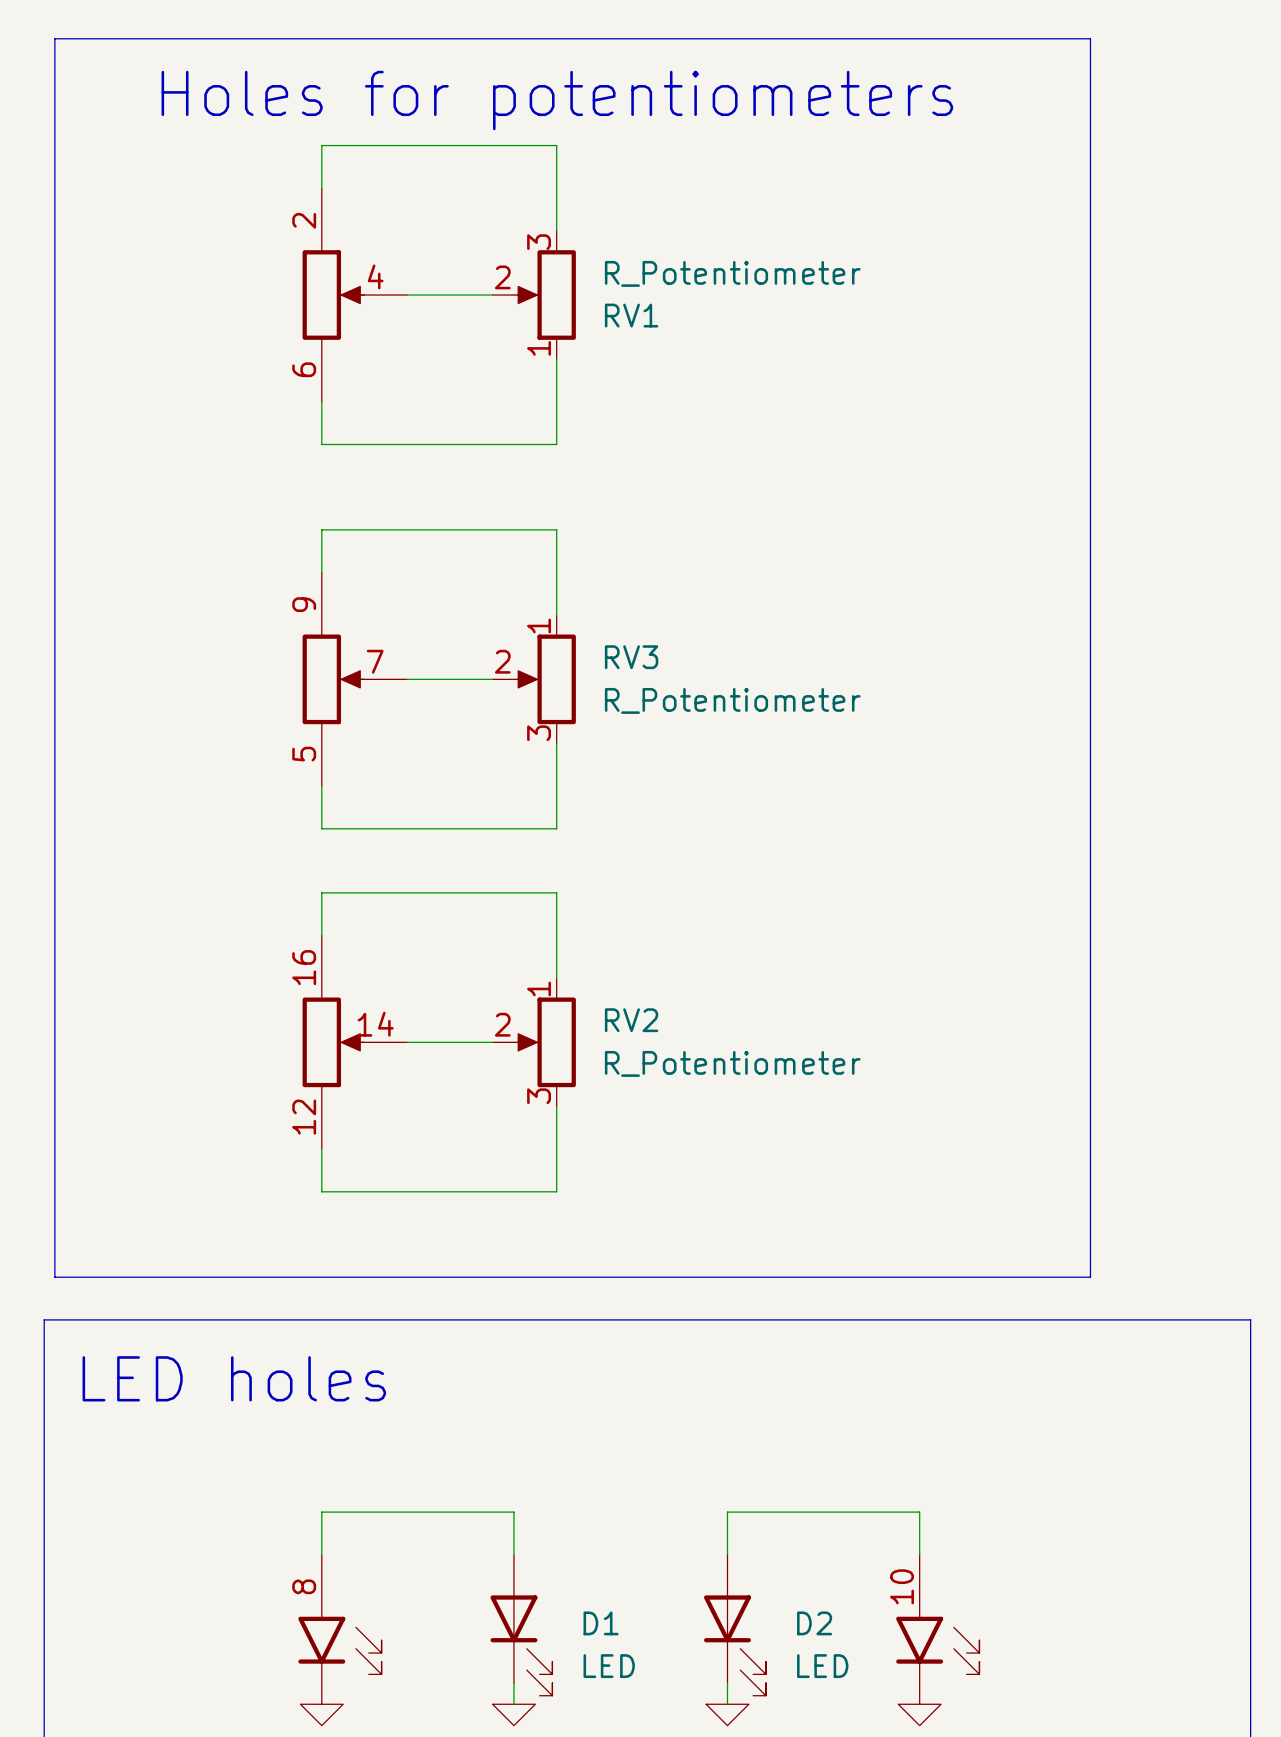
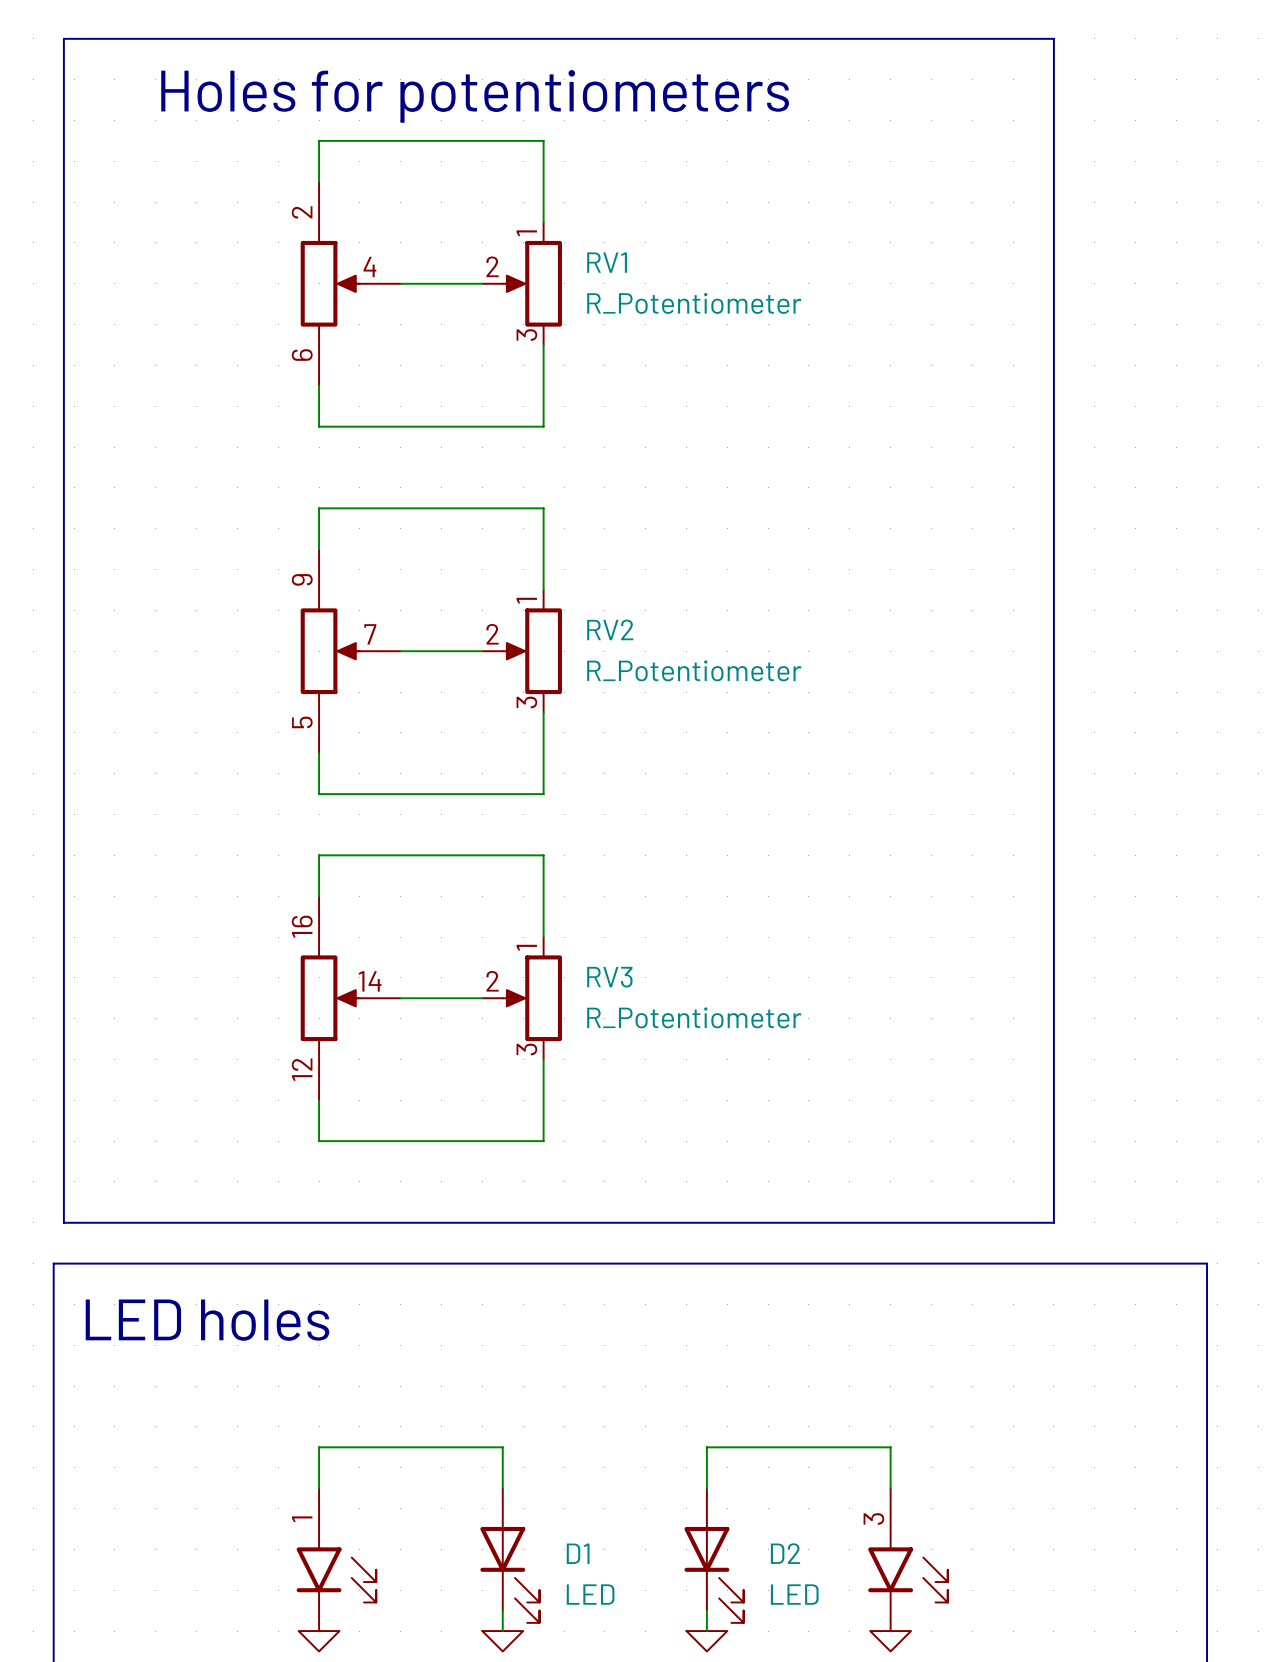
RV1 flip: as is (544, 295) -> up-down (532, 283)
RV3 name: RV3 (631, 657) -> RV2 (610, 629)
RV2 name: RV2 (631, 1020) -> RV3 (609, 977)
part pin number: 8 (304, 1586) -> 1 (302, 1519)
part pin number: 10 (902, 1586) -> 3 (873, 1518)

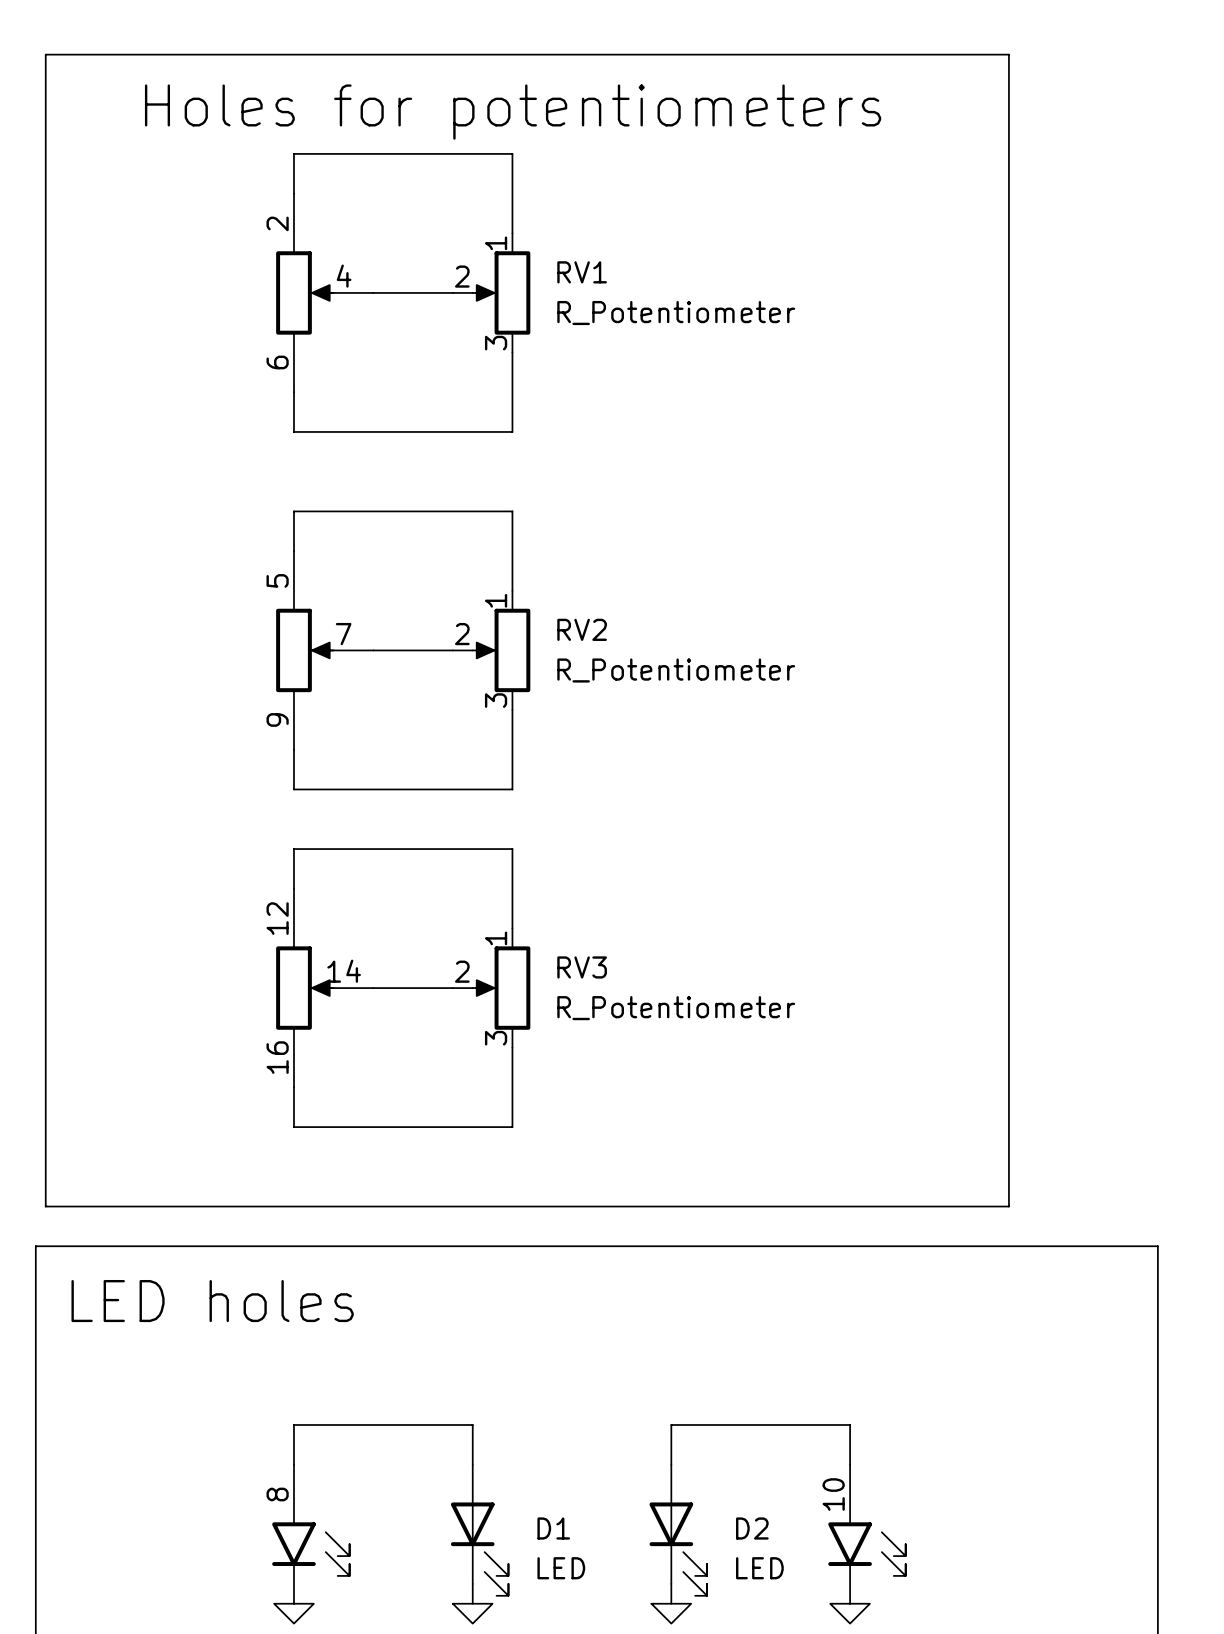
part flip: as is (330, 651) -> up-down (304, 650)
part flip: as is (330, 998) -> up-down (304, 988)
part pin number: 3 (873, 1518) -> 10 (833, 1494)
part pin number: 1 (302, 1519) -> 8 (277, 1494)

